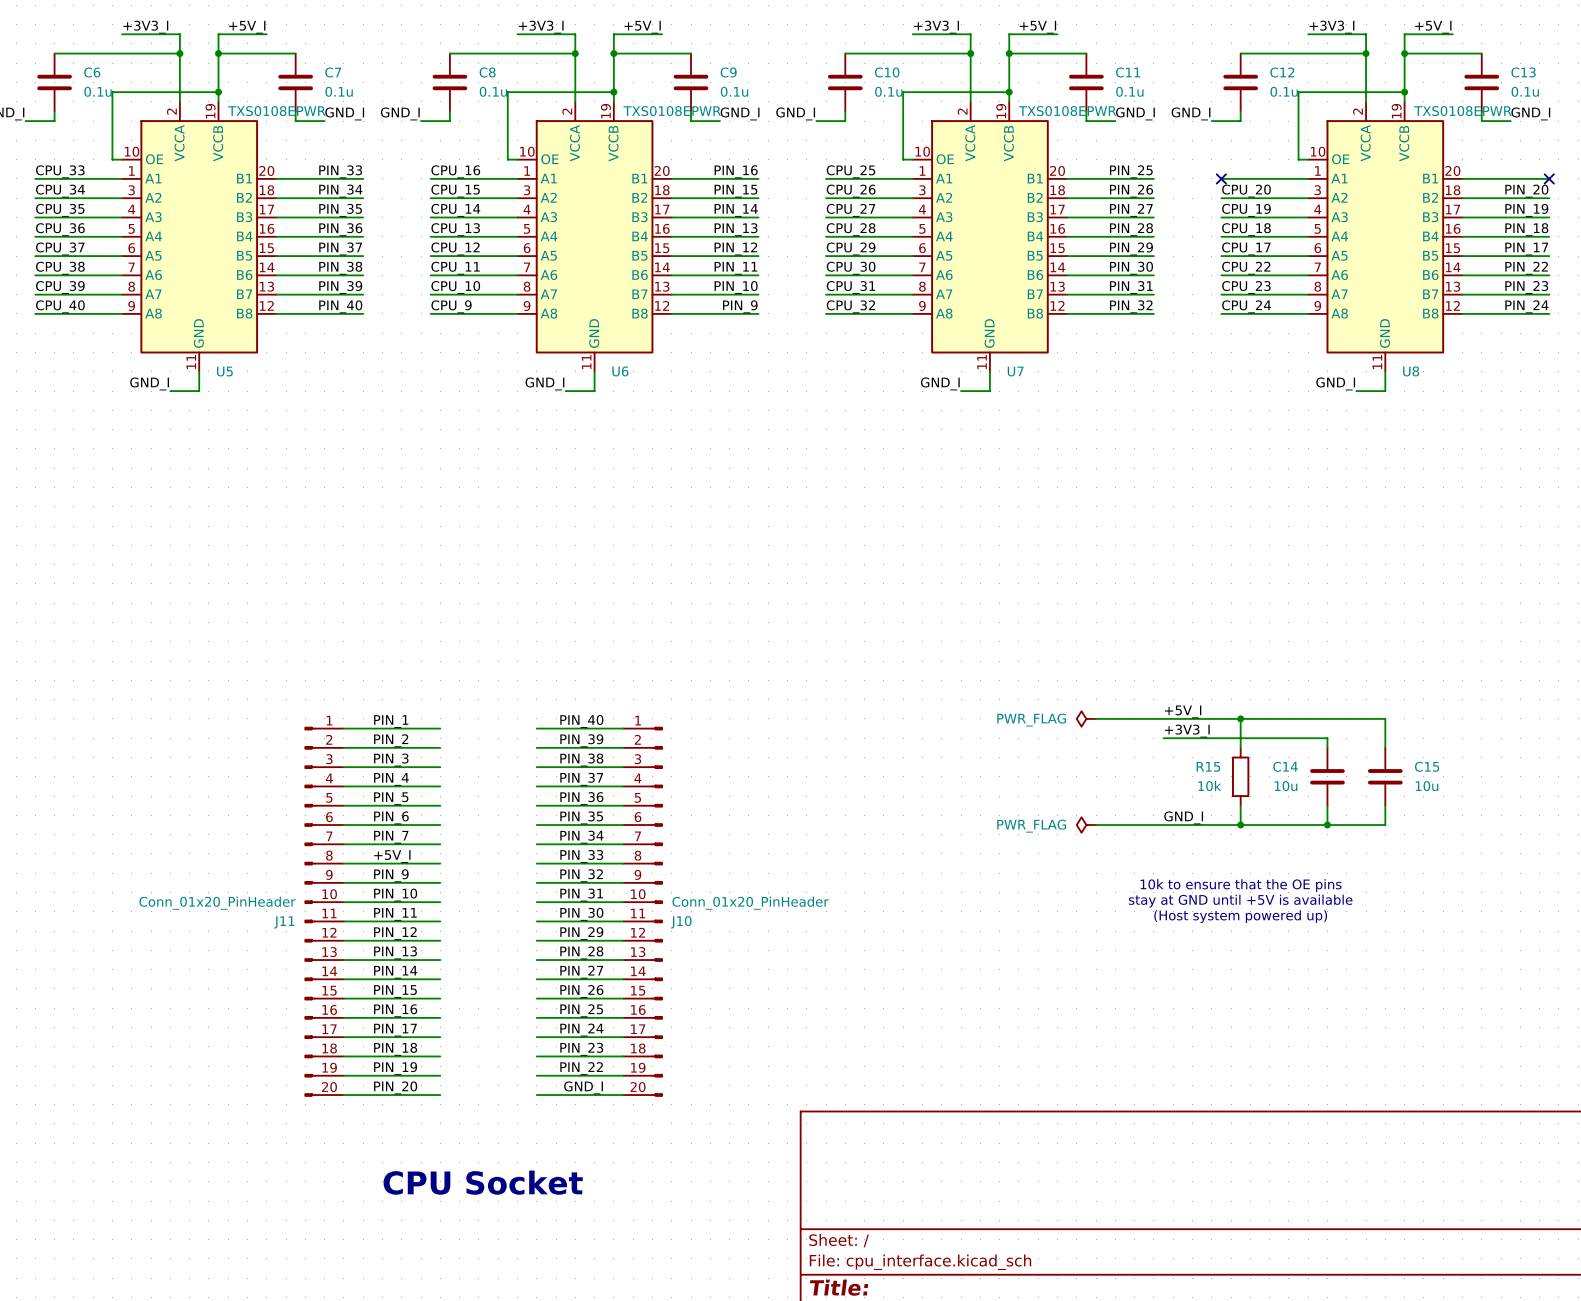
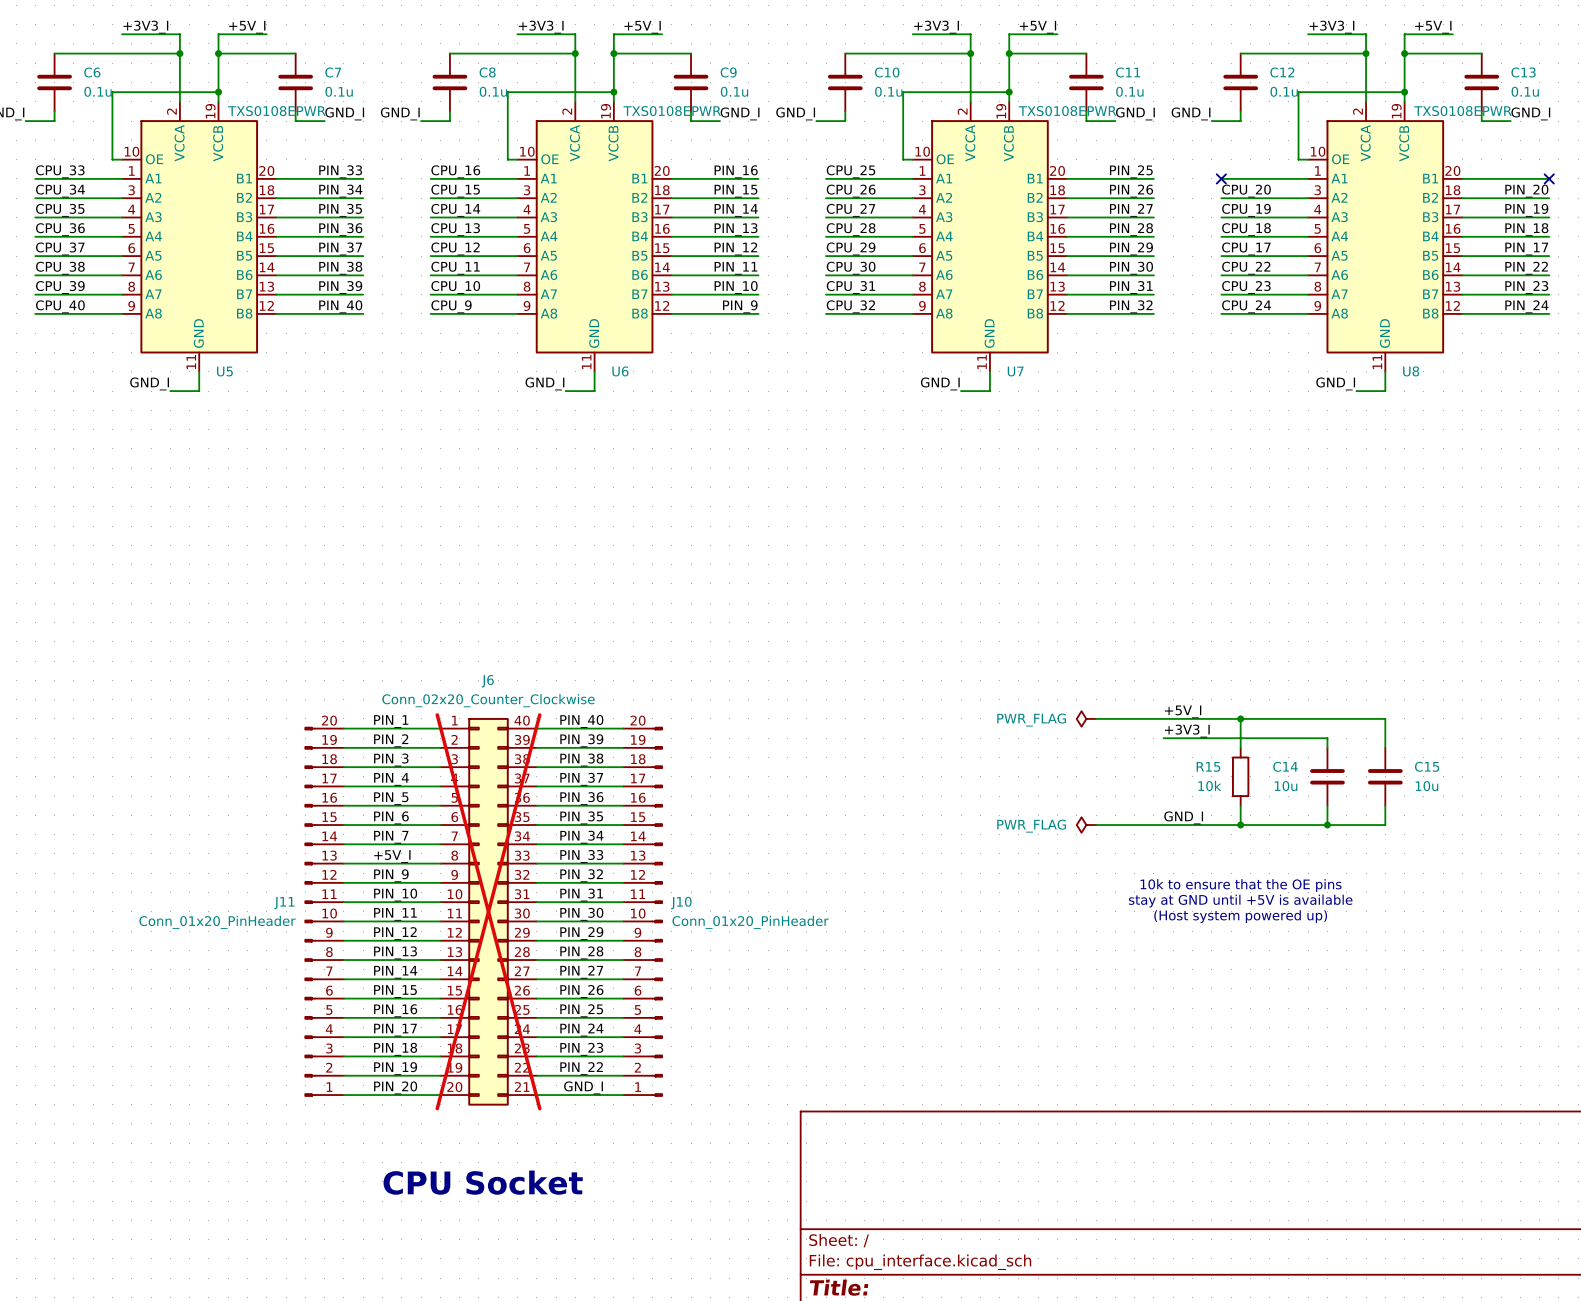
J11 flip: as is (310, 911) -> up-down (310, 911)
J6: none -> Conn_02x20_Counter_Clockwise (488, 911)
J10 flip: as is (657, 911) -> up-down (657, 911)

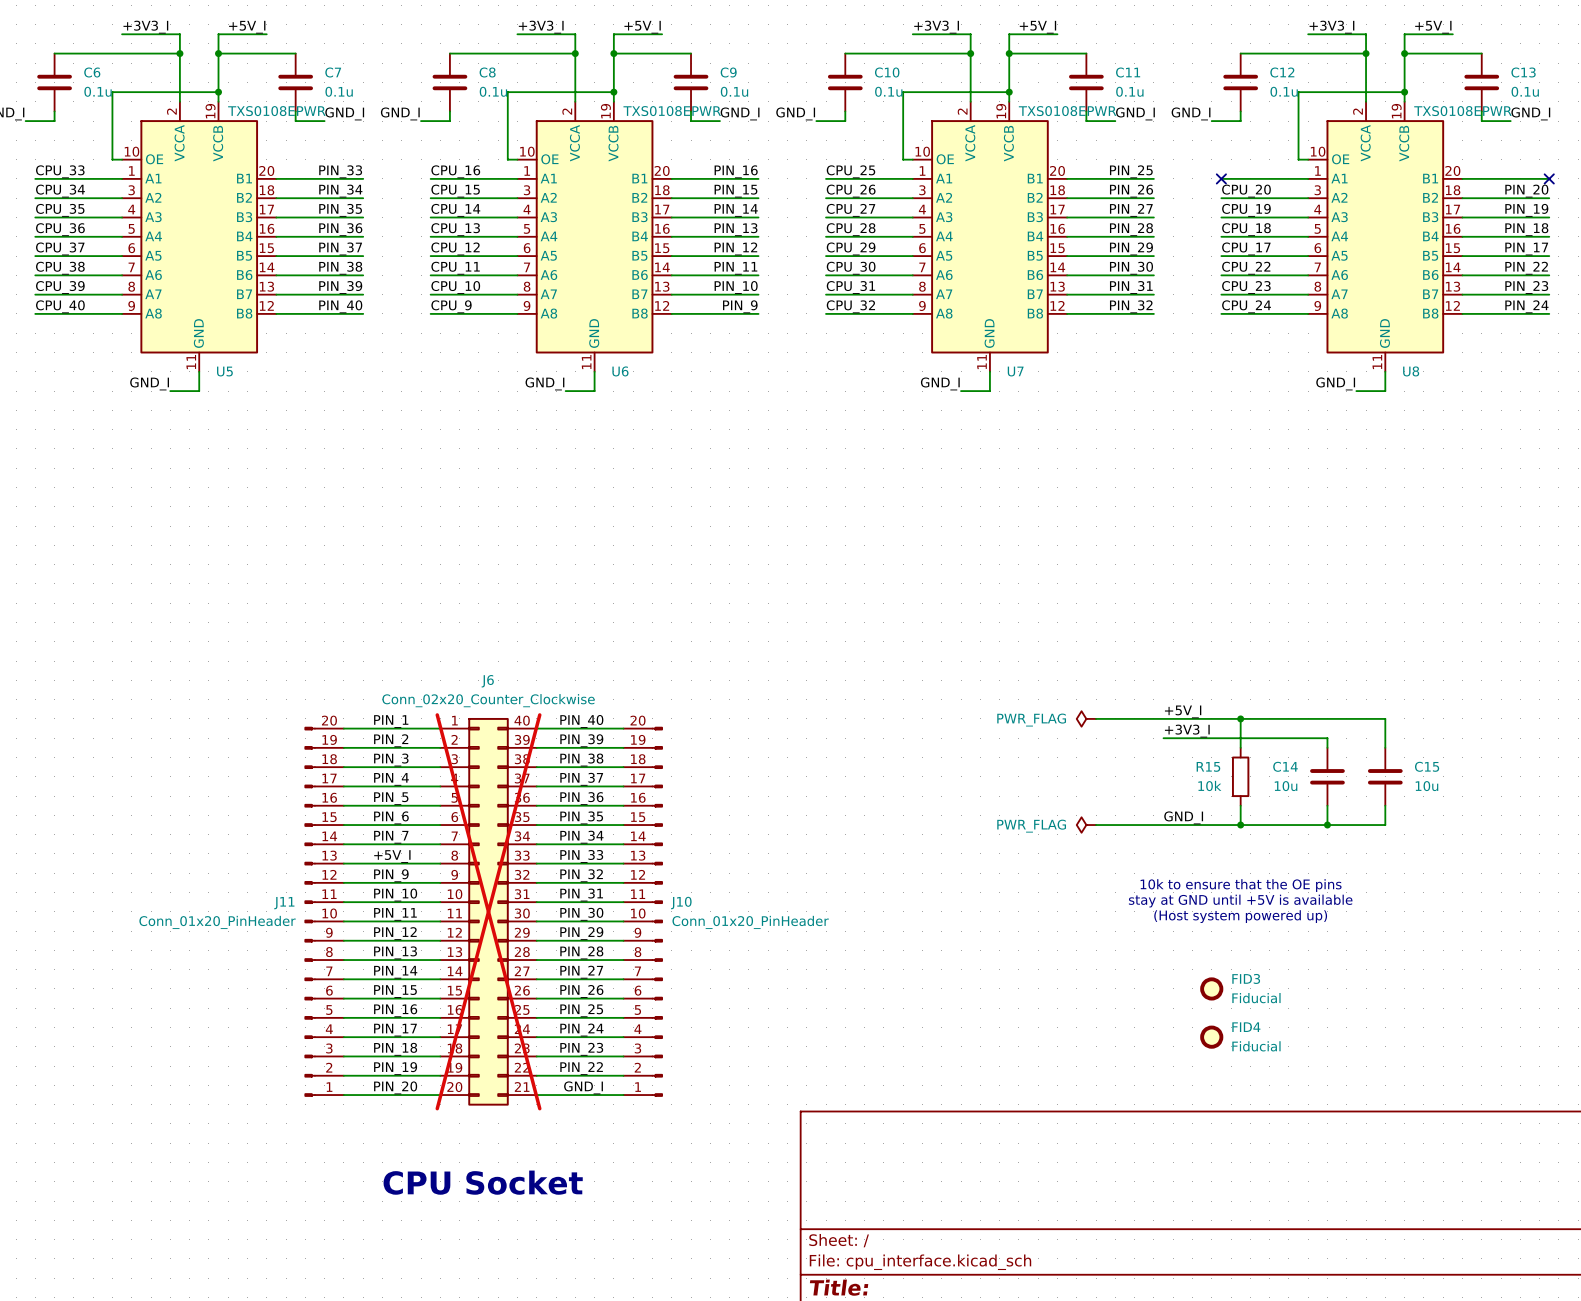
FID3: none -> Fiducial (1211, 988)
FID4: none -> Fiducial (1211, 1037)

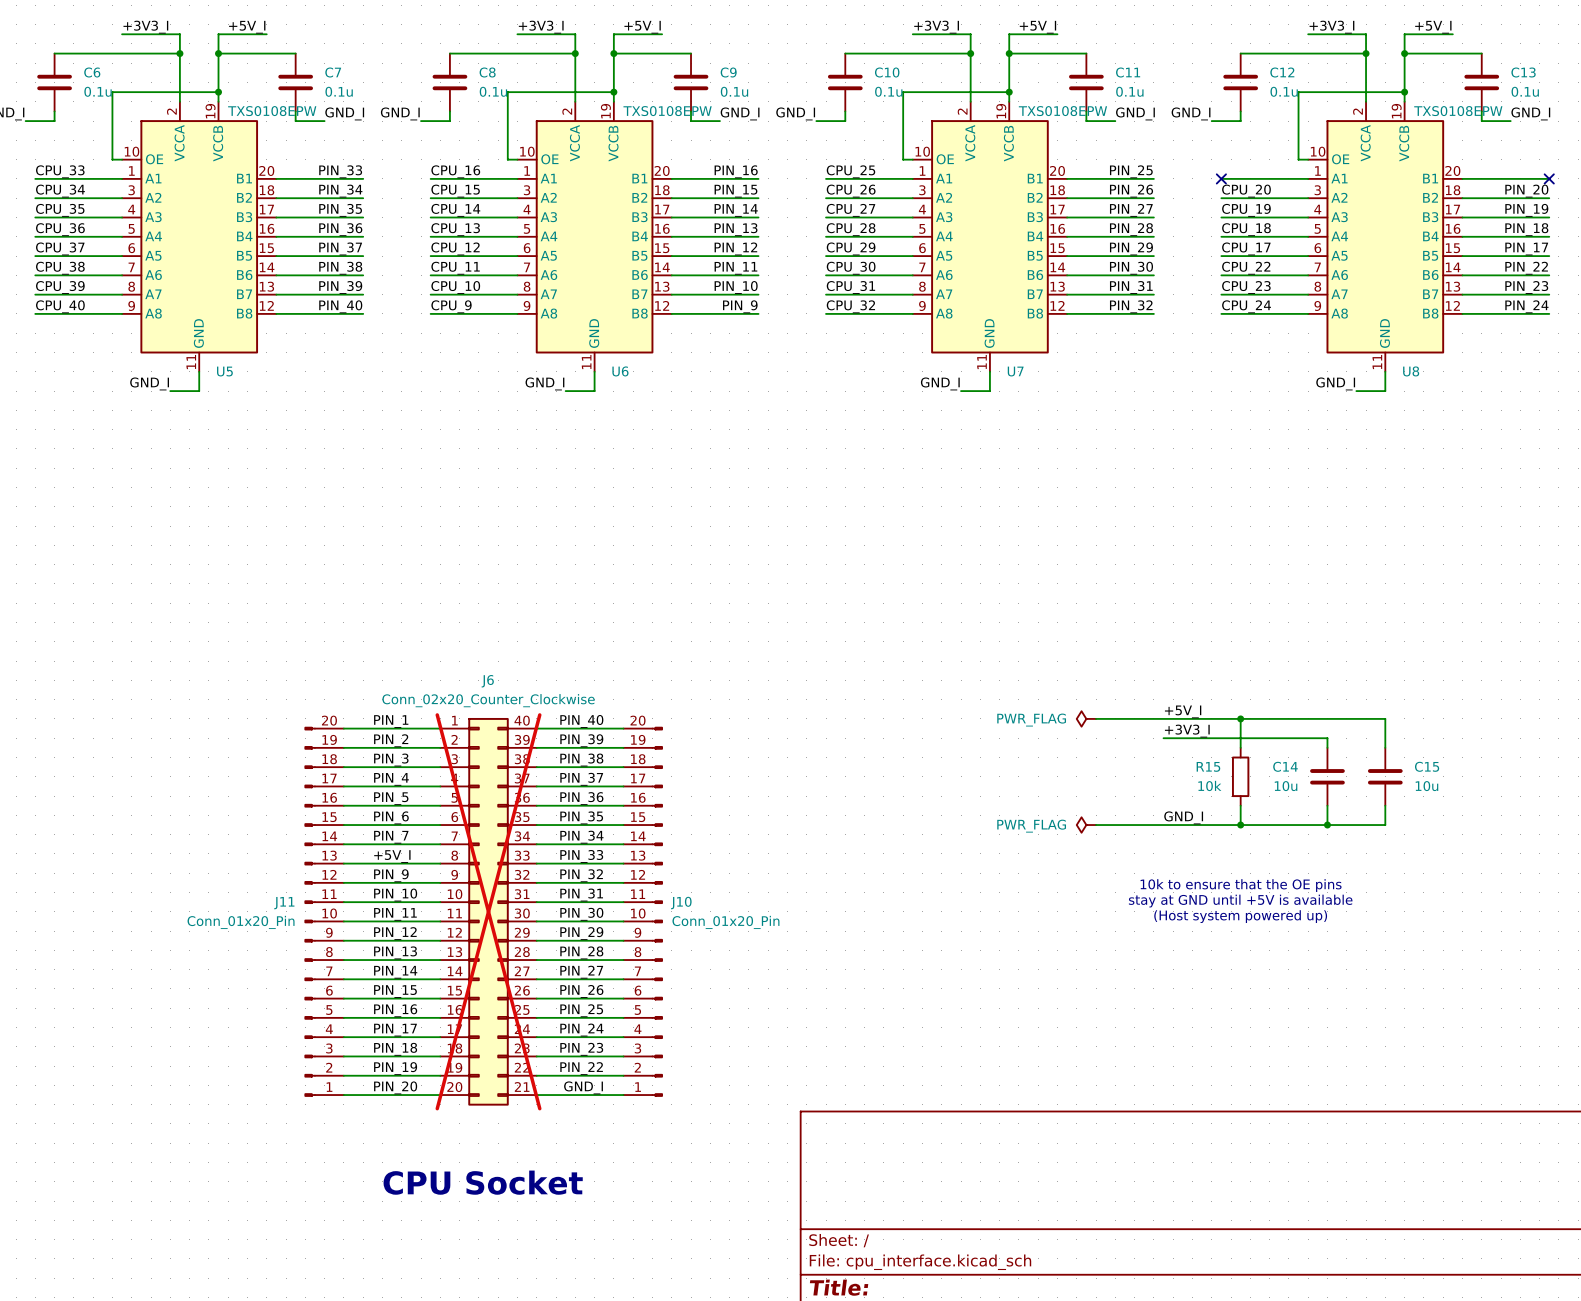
U5 value: TXS0108EPWR (276, 111) -> TXS0108EPW (272, 111)
U6 value: TXS0108EPWR (672, 111) -> TXS0108EPW (667, 111)
U7 value: TXS0108EPWR (1067, 111) -> TXS0108EPW (1062, 111)
U8 value: TXS0108EPWR (1462, 111) -> TXS0108EPW (1458, 111)
J11 value: Conn_01x20_PinHeader (217, 922) -> Conn_01x20_Pin (241, 922)
J10 value: Conn_01x20_PinHeader (750, 922) -> Conn_01x20_Pin (725, 922)
FID3: Fiducial (1211, 988) -> none
FID4: Fiducial (1211, 1037) -> none

